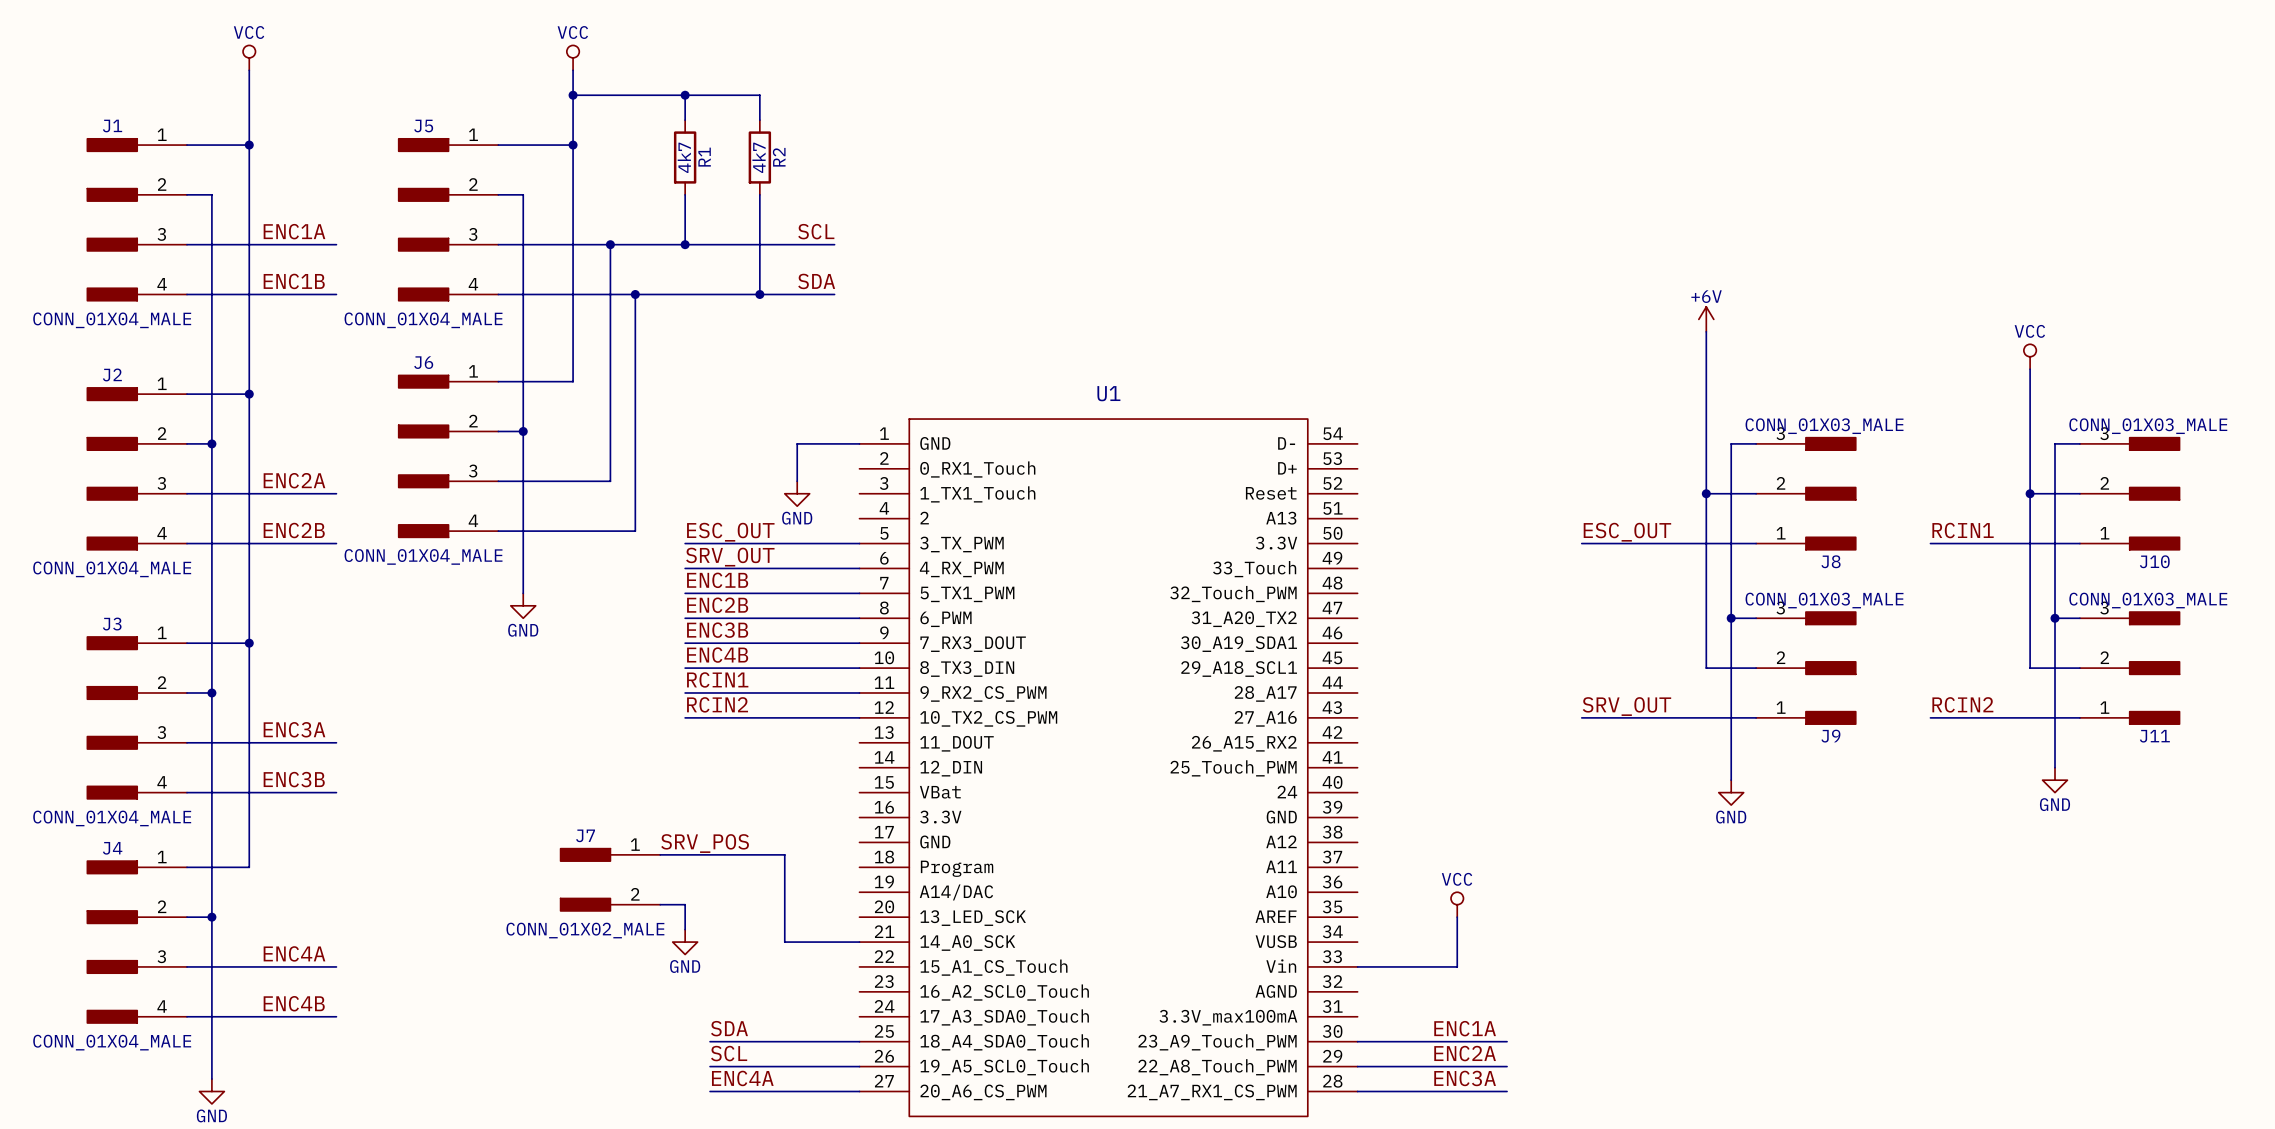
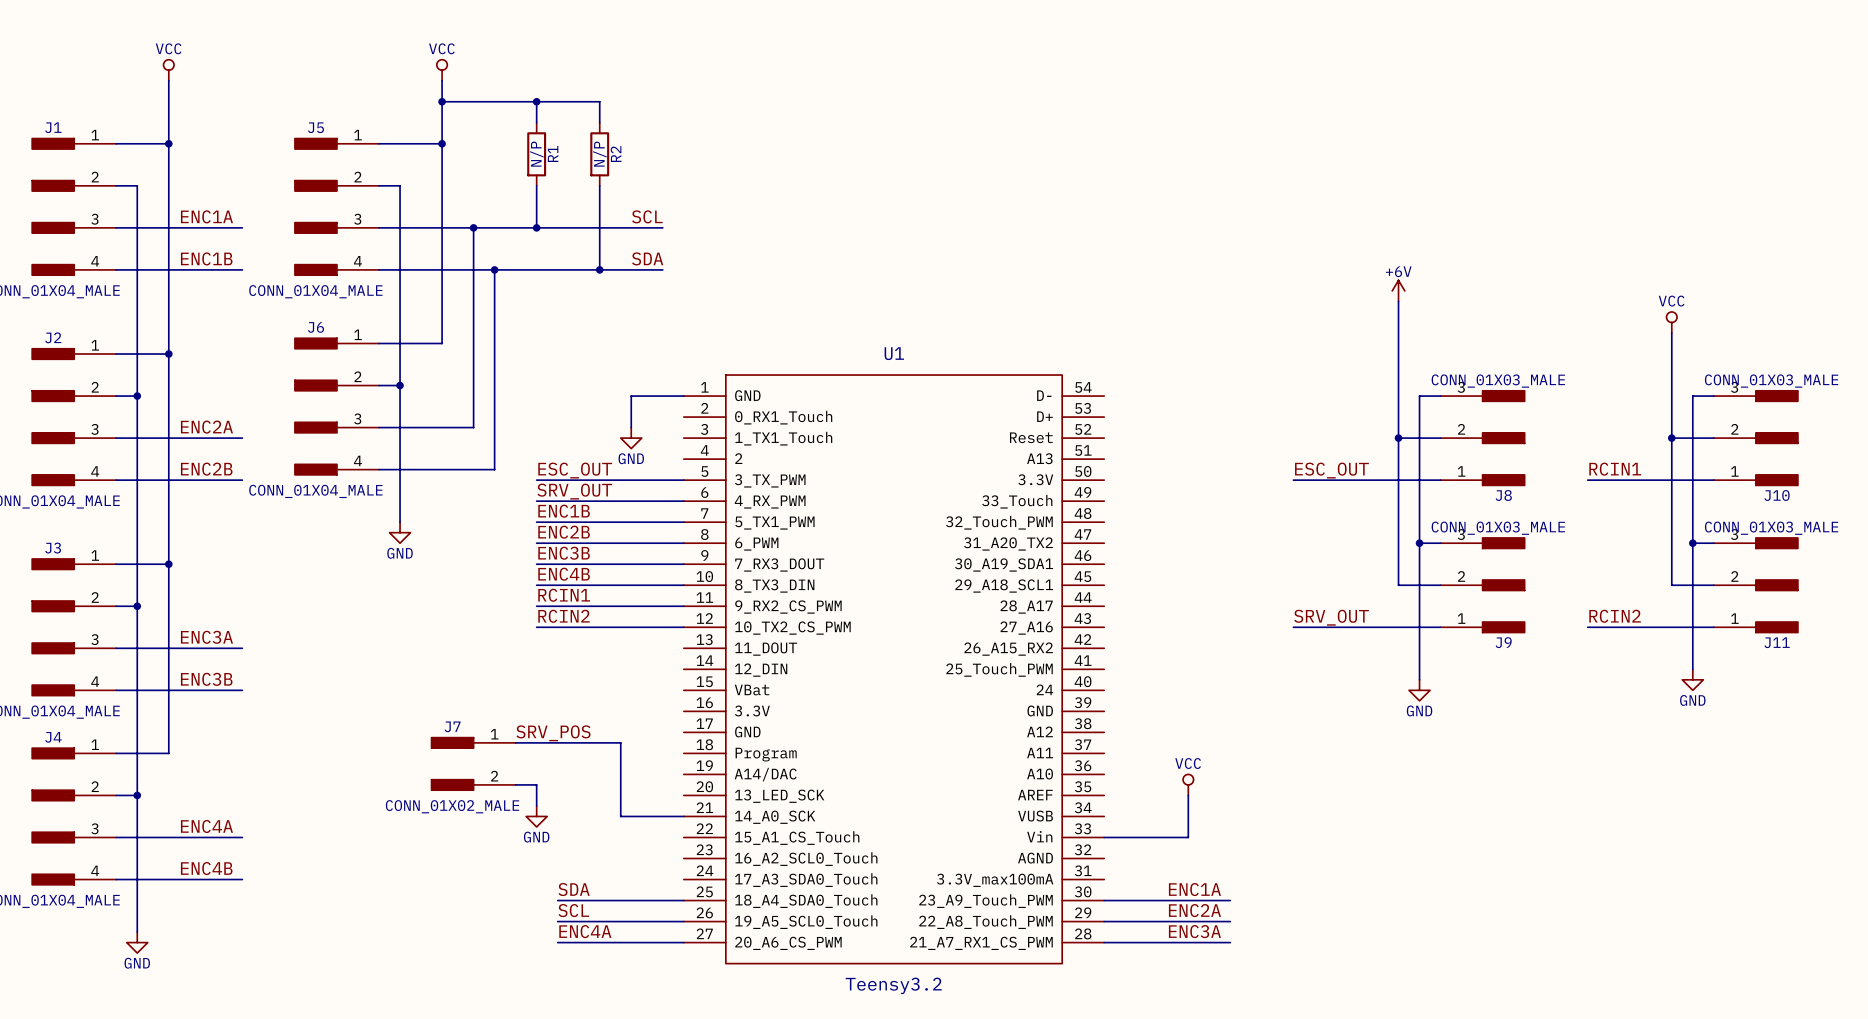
R1 value: 4k7 (684, 157) -> N/P (536, 154)
R2 value: 4k7 (759, 157) -> N/P (599, 154)

